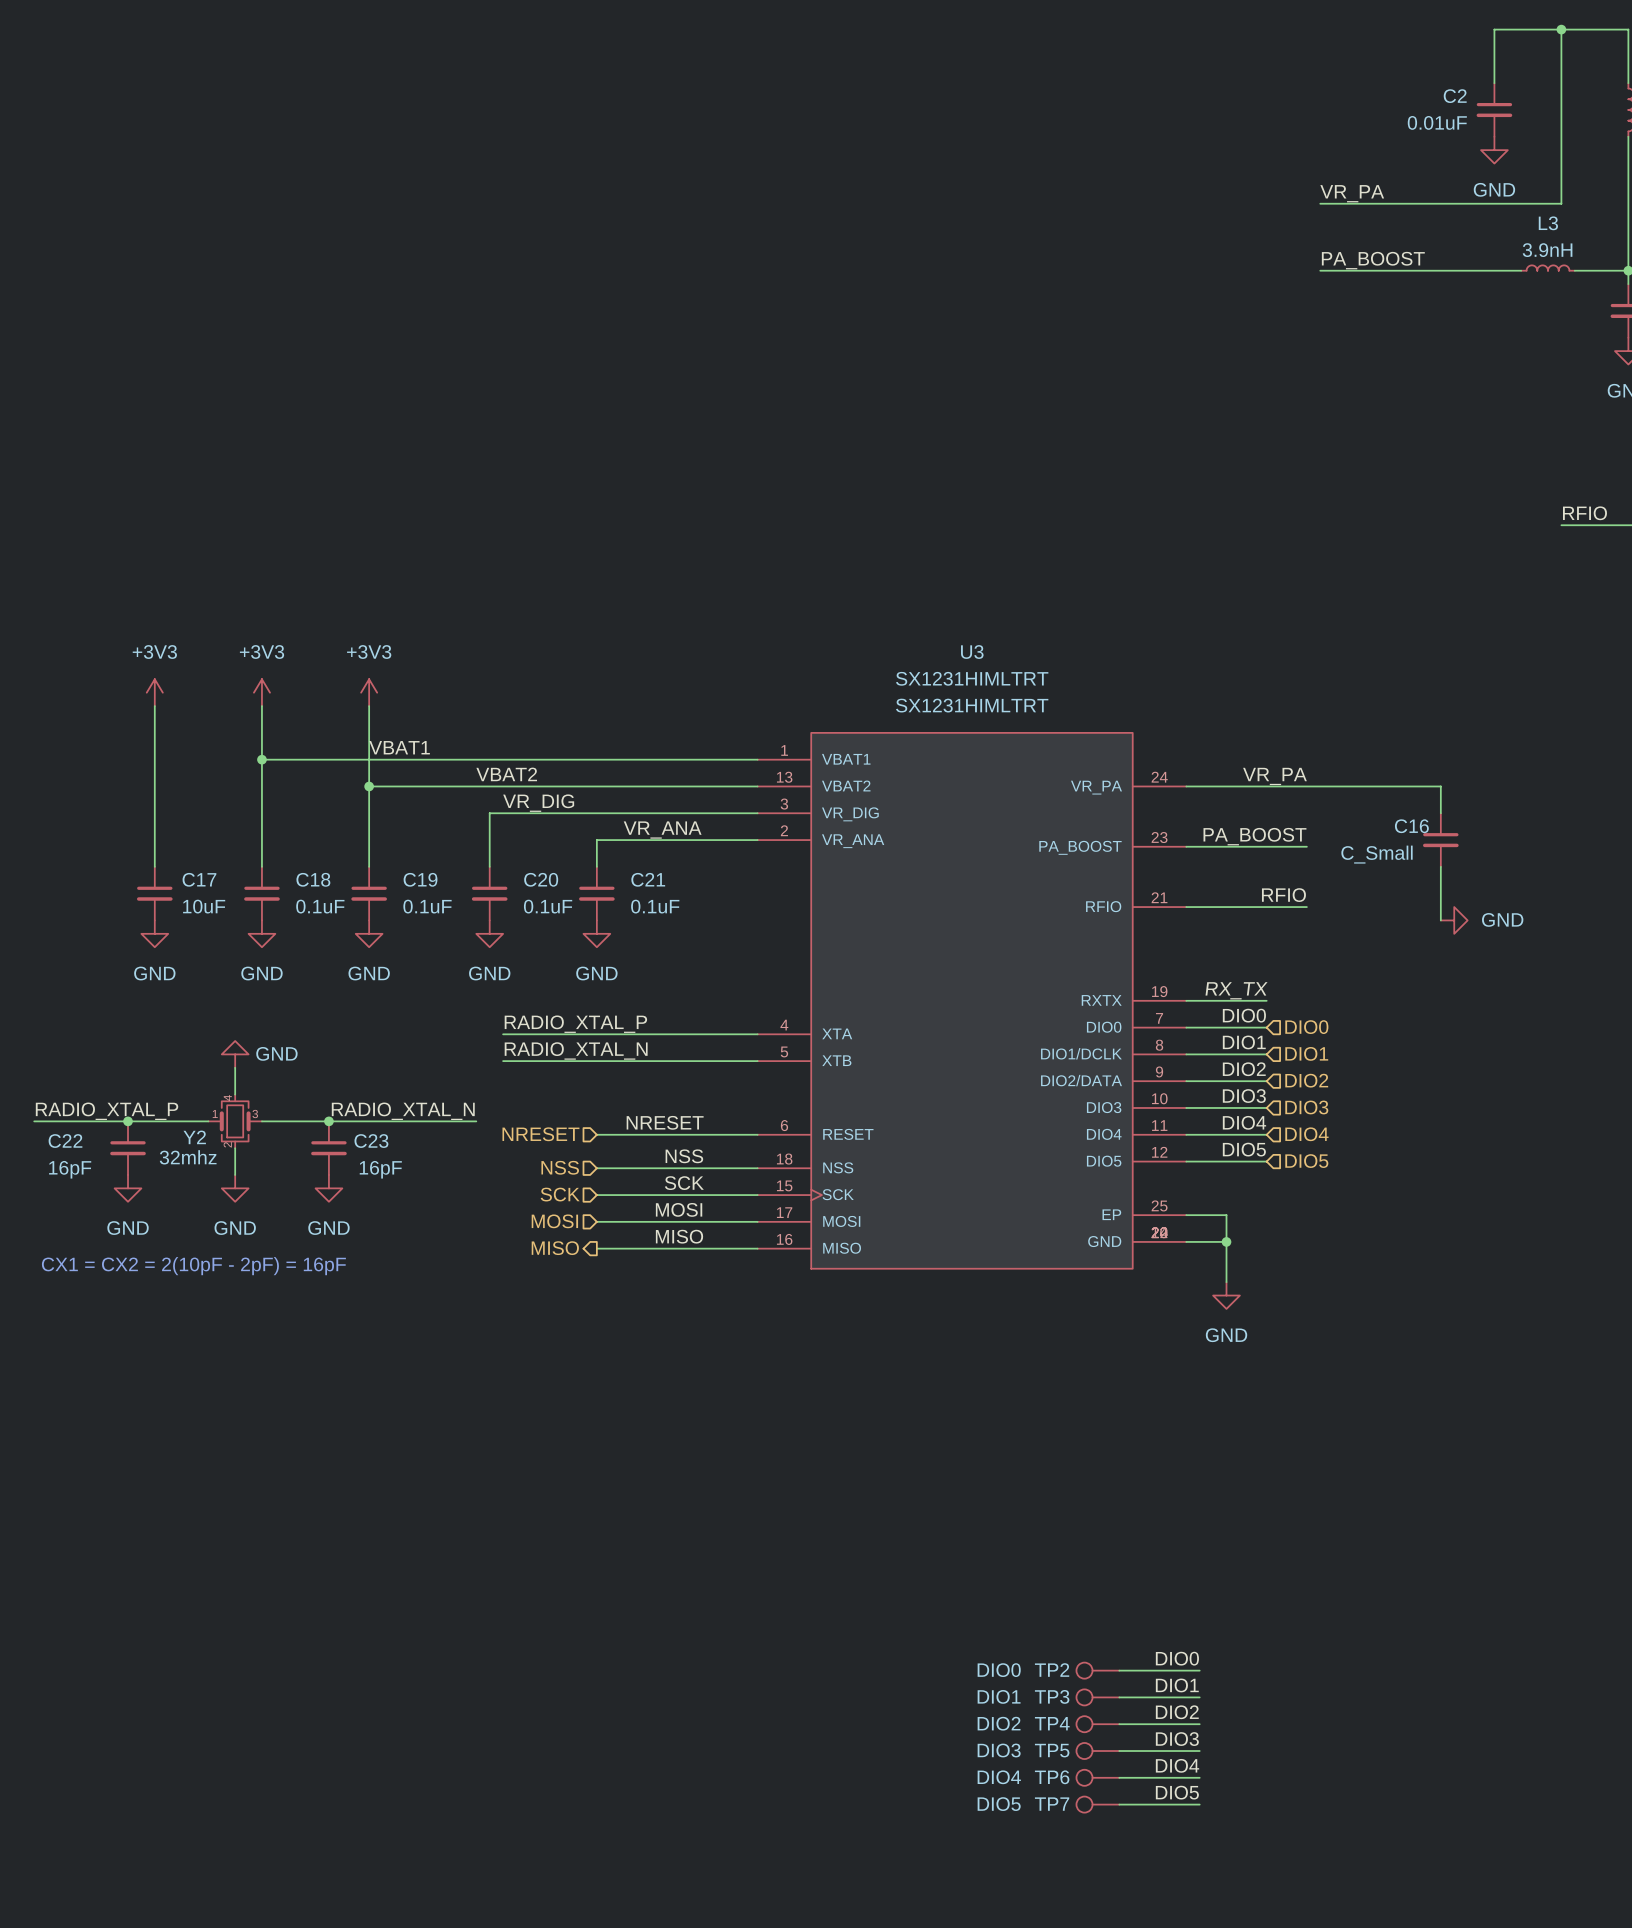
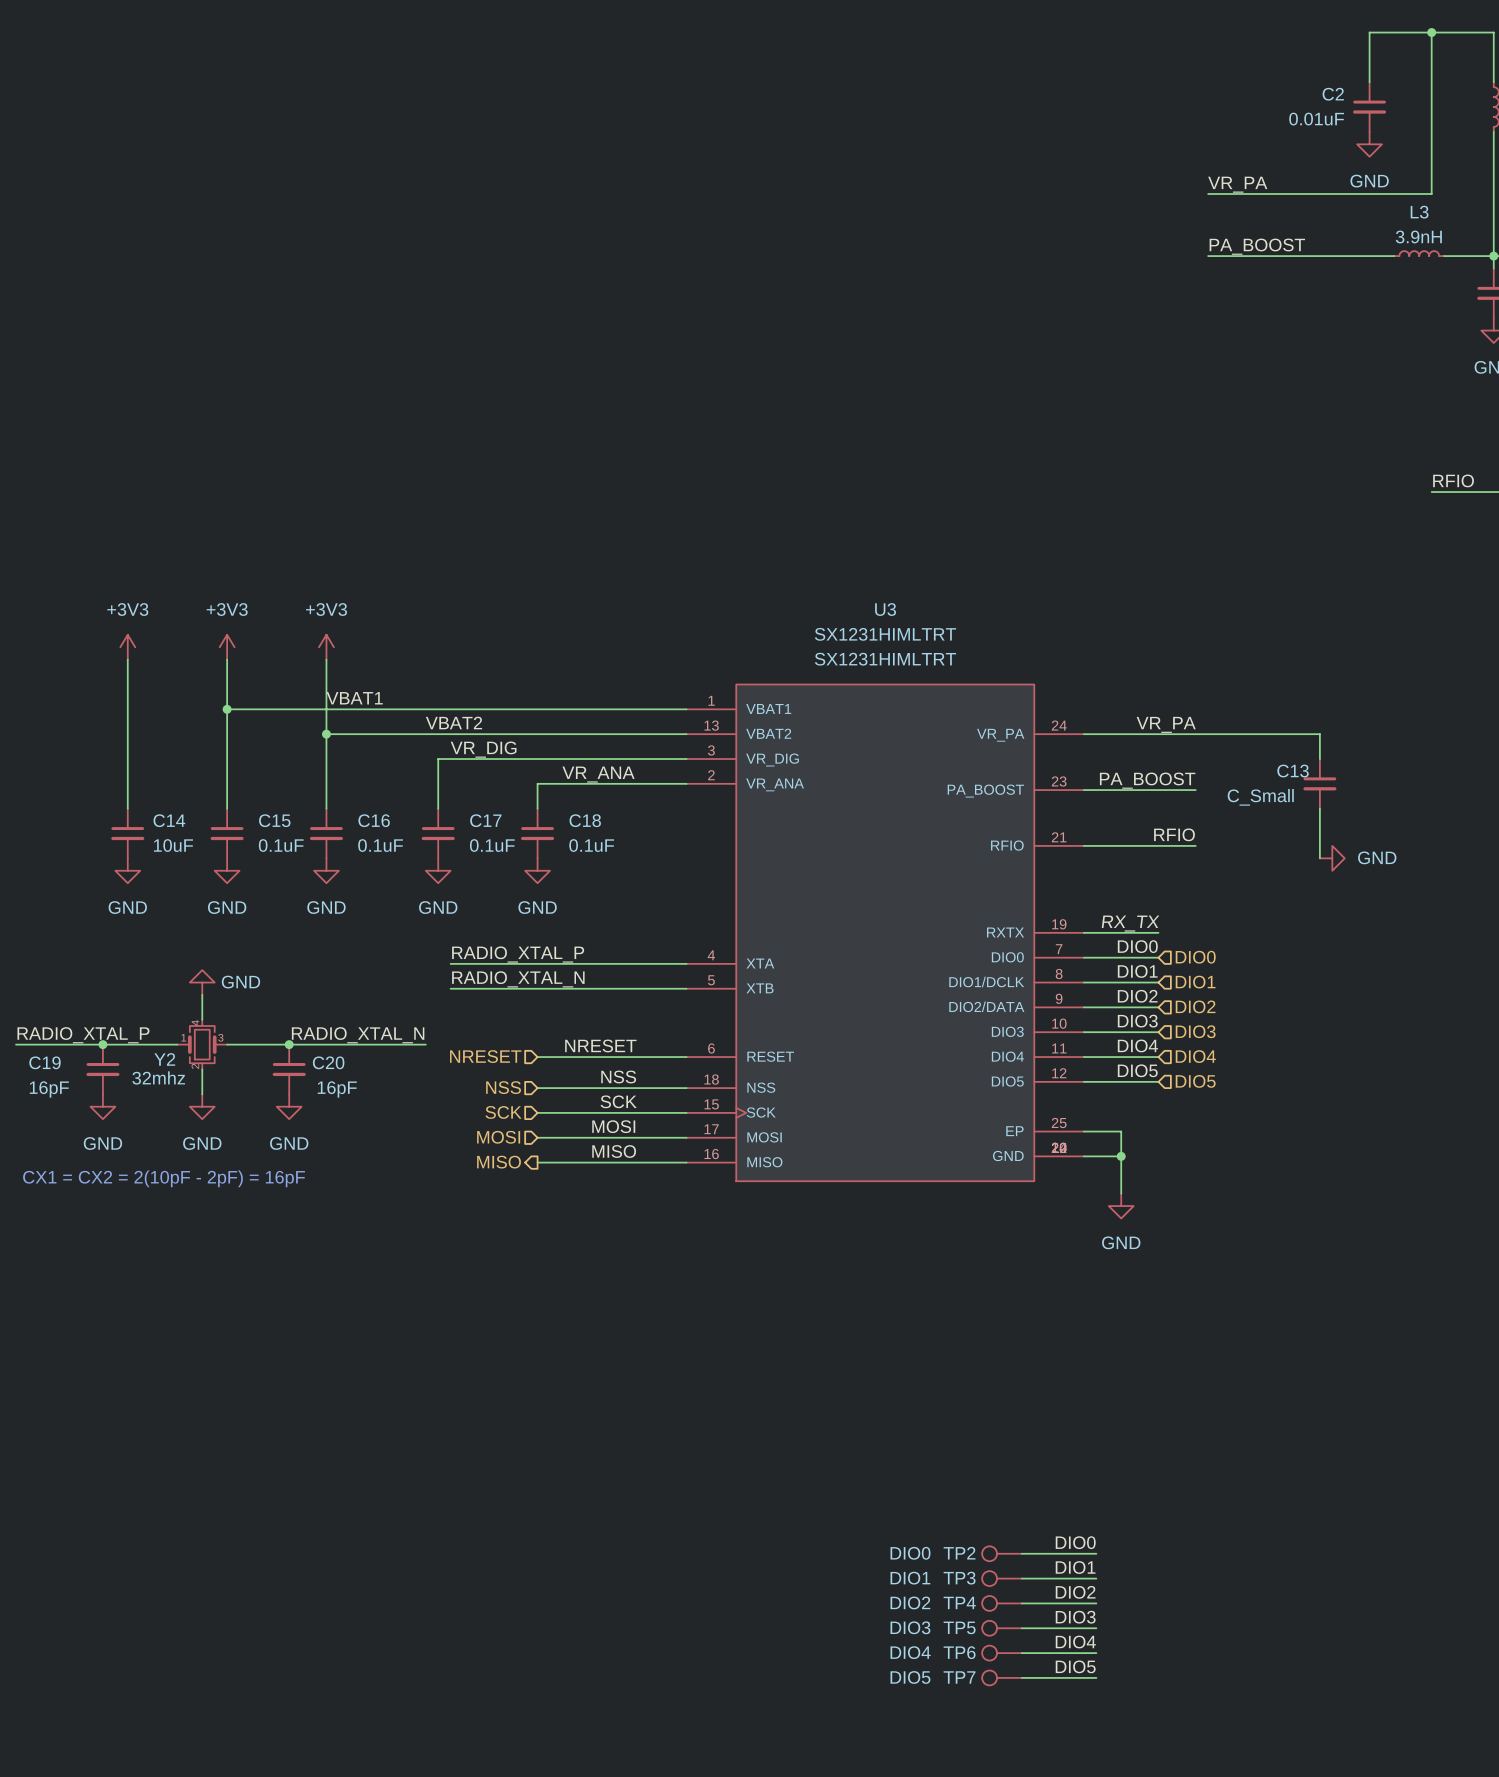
C16 name: C16 (1411, 826) -> C13 (1293, 771)
C17 name: C17 (199, 879) -> C14 (169, 820)
C18 name: C18 (313, 879) -> C15 (274, 820)
C19 name: C19 (420, 879) -> C16 (374, 820)
C20 name: C20 (541, 879) -> C17 (485, 820)
C21 name: C21 (648, 879) -> C18 (585, 820)
C22 name: C22 (65, 1141) -> C19 (45, 1062)
C23 name: C23 (371, 1141) -> C20 (328, 1062)

